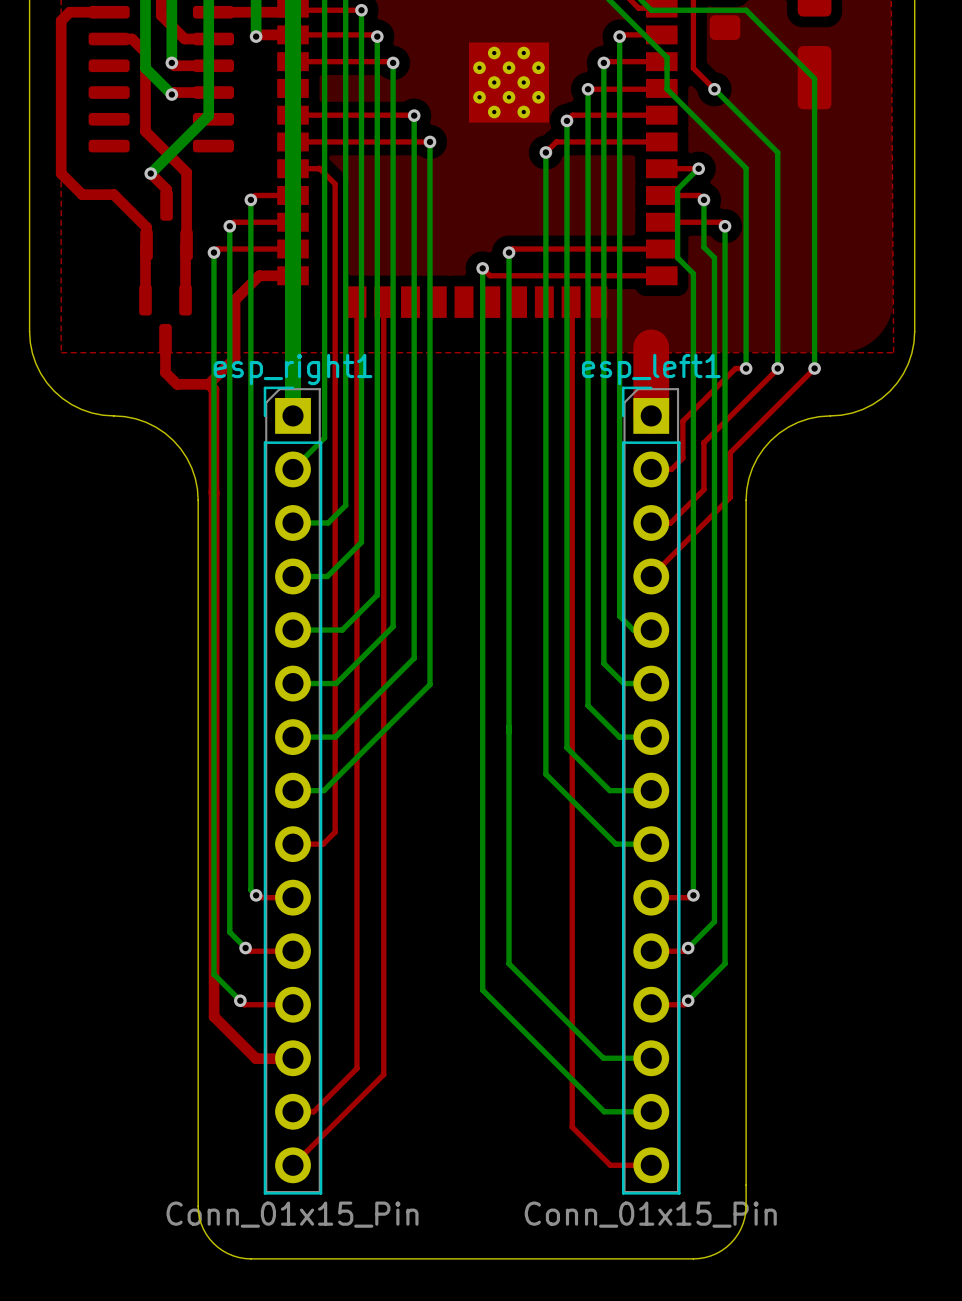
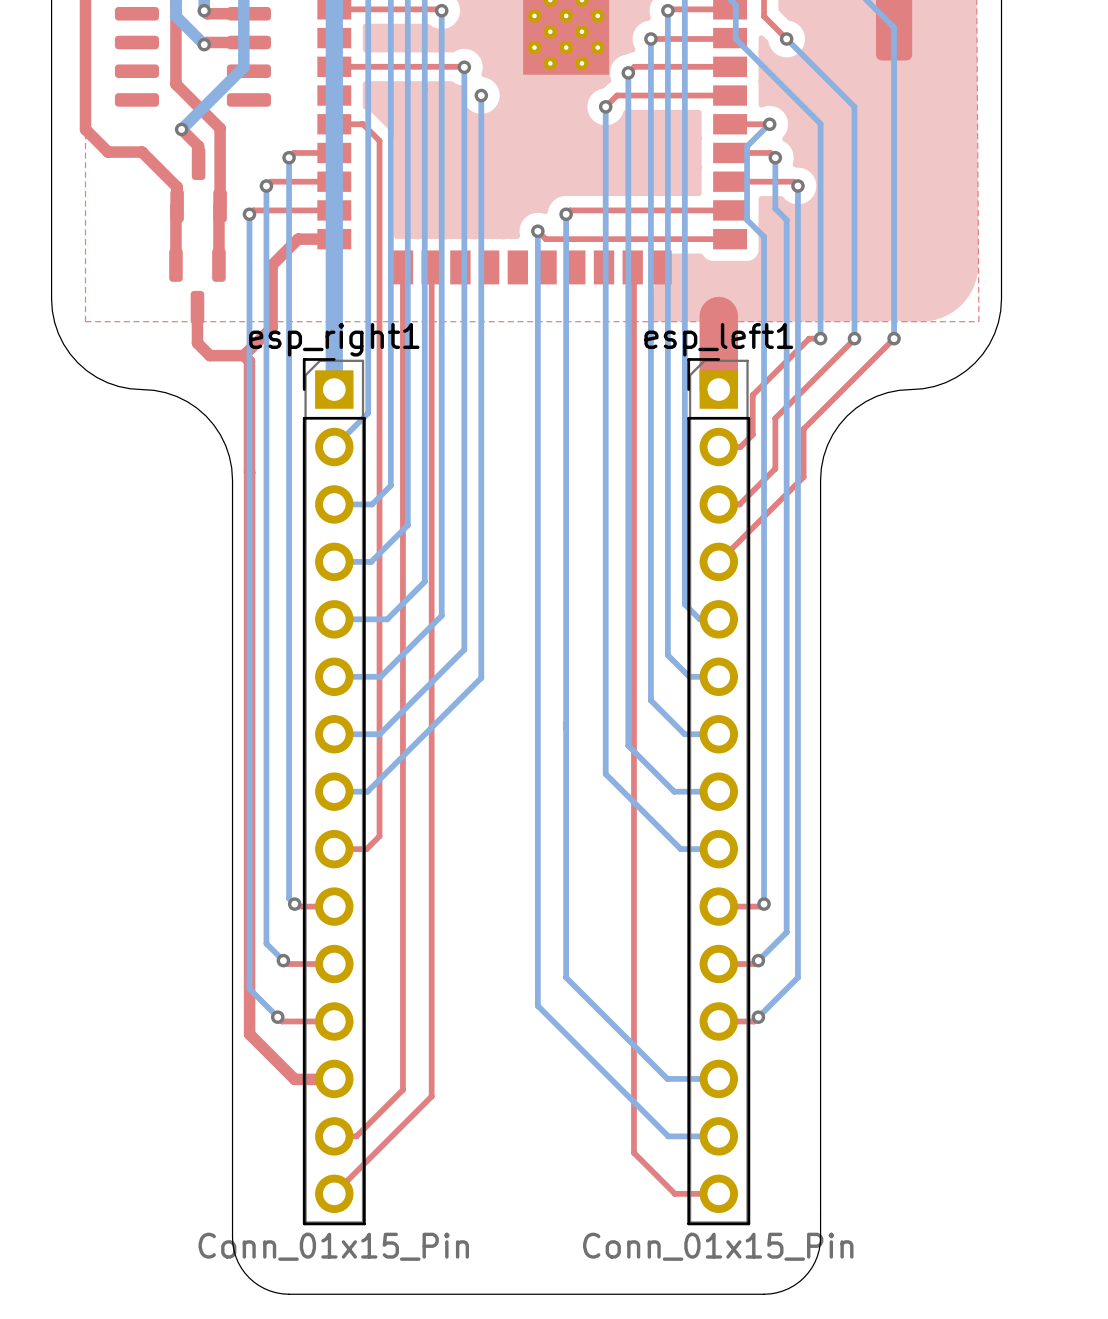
top track: (429, 141) (293, 141) -> none

